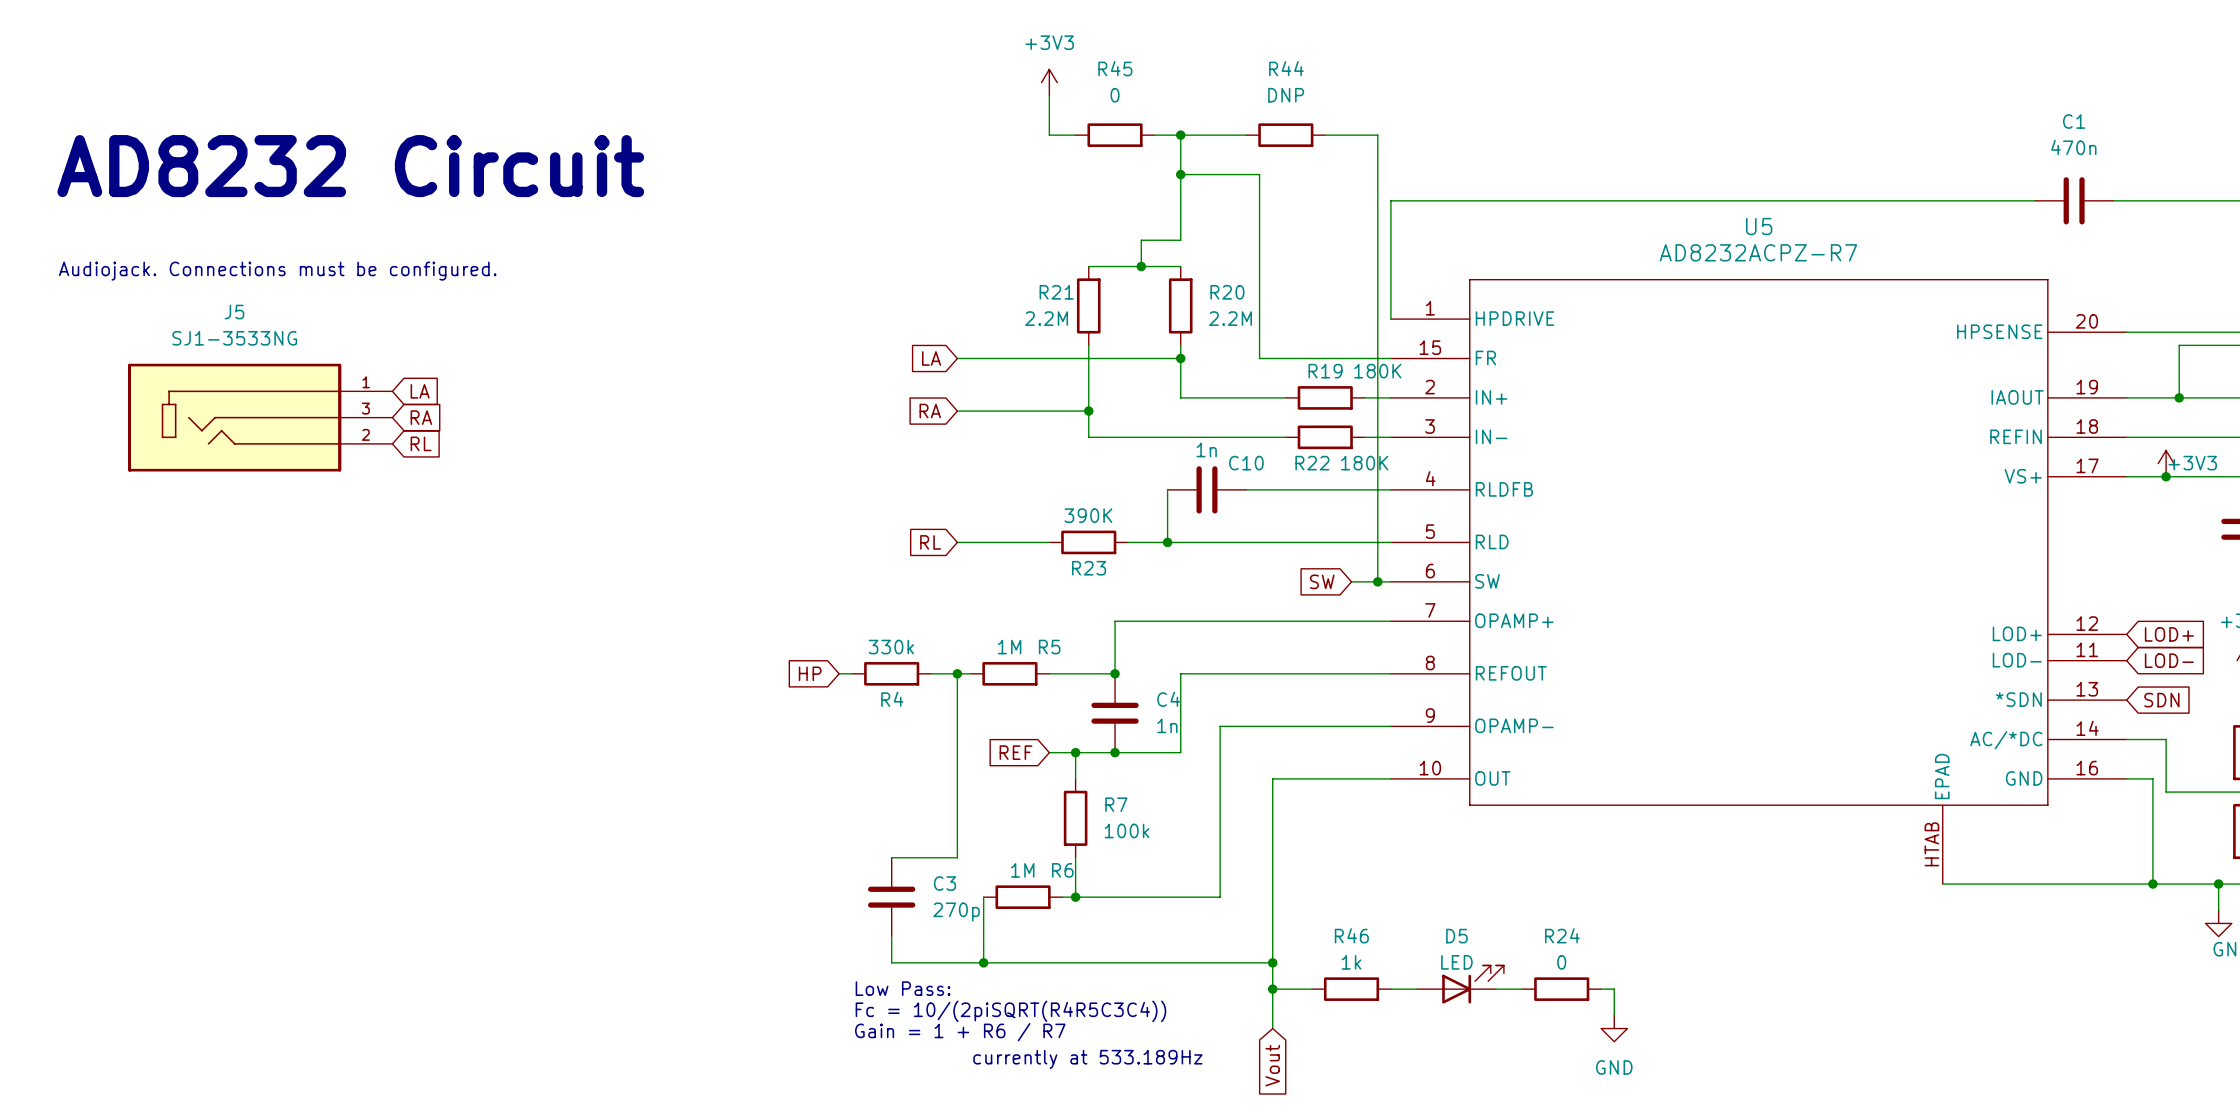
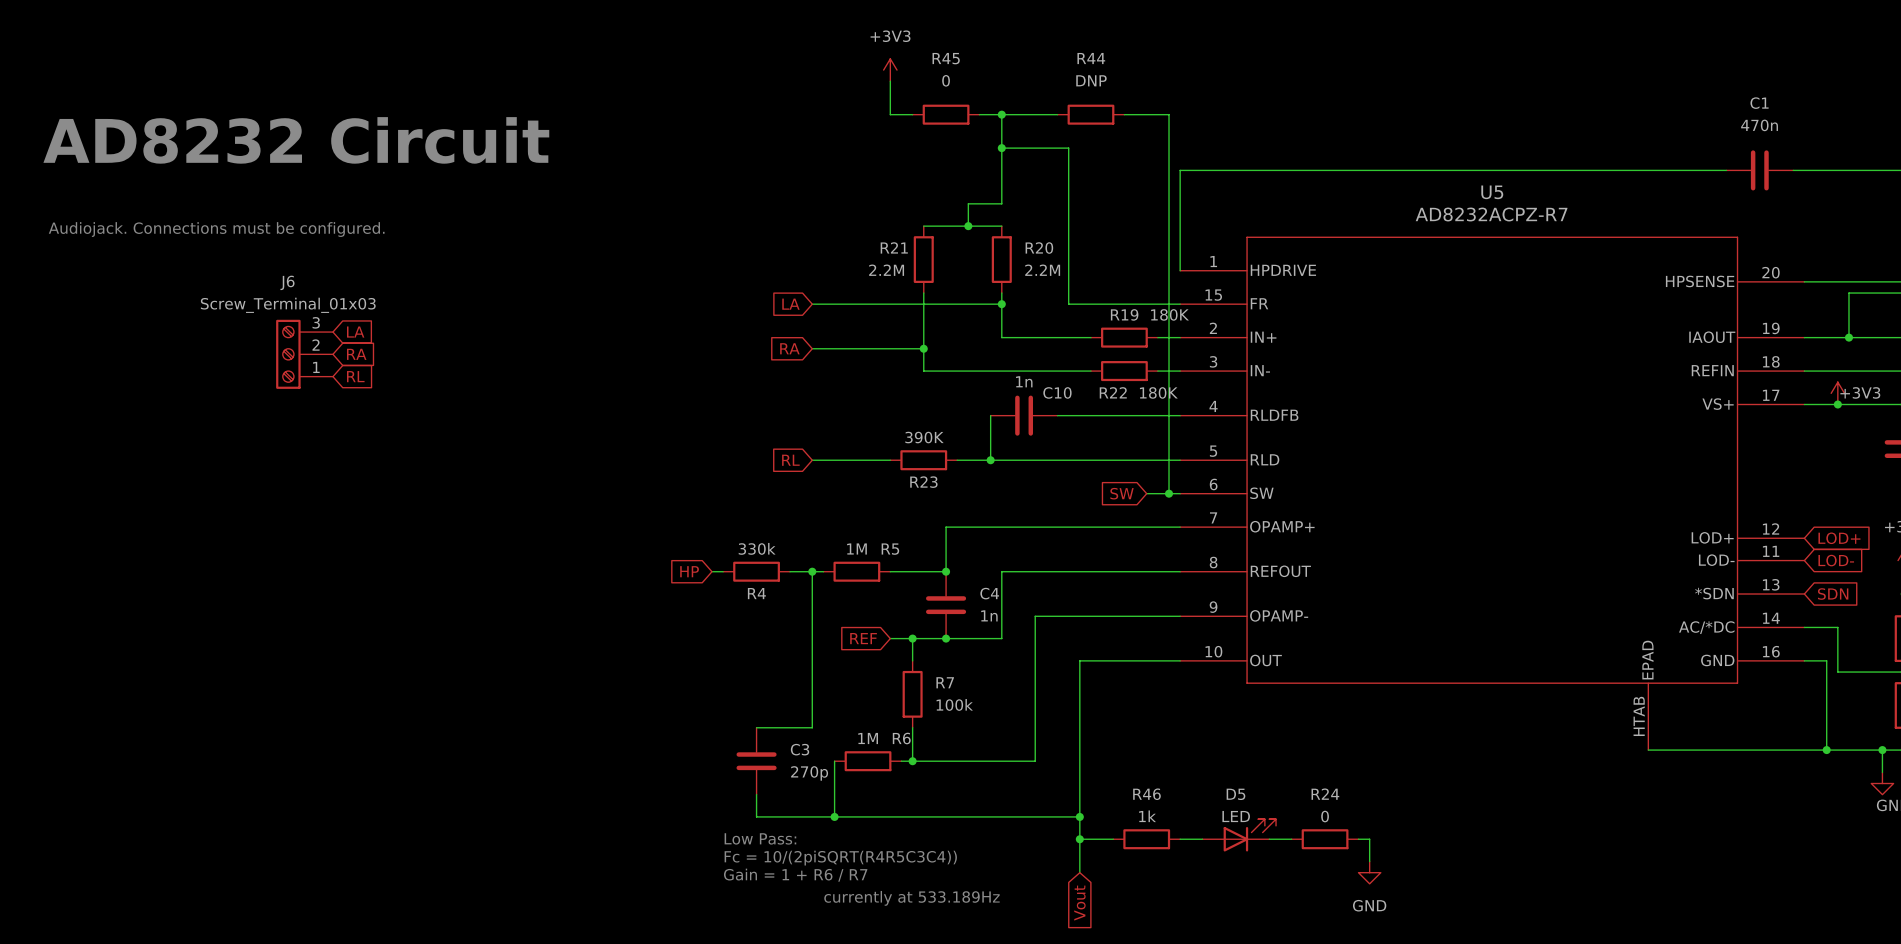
J5: SJ1-3533NG (260, 417) -> none
J6: none -> Screw_Terminal_01x03 (304, 354)

